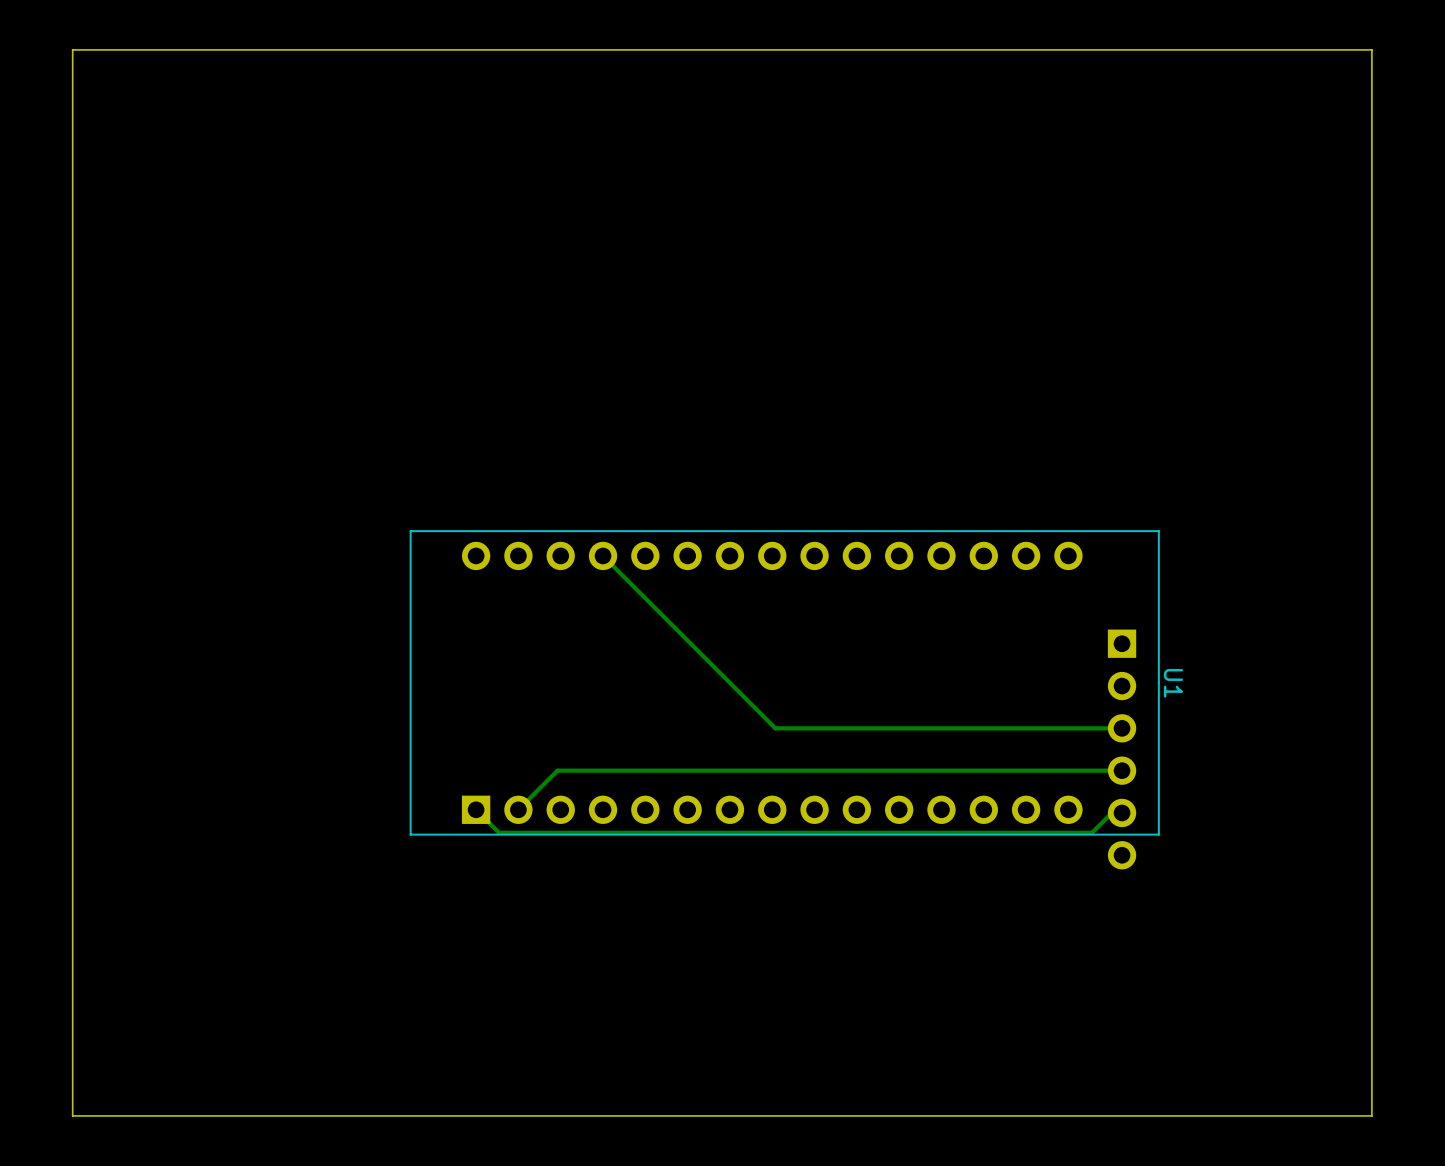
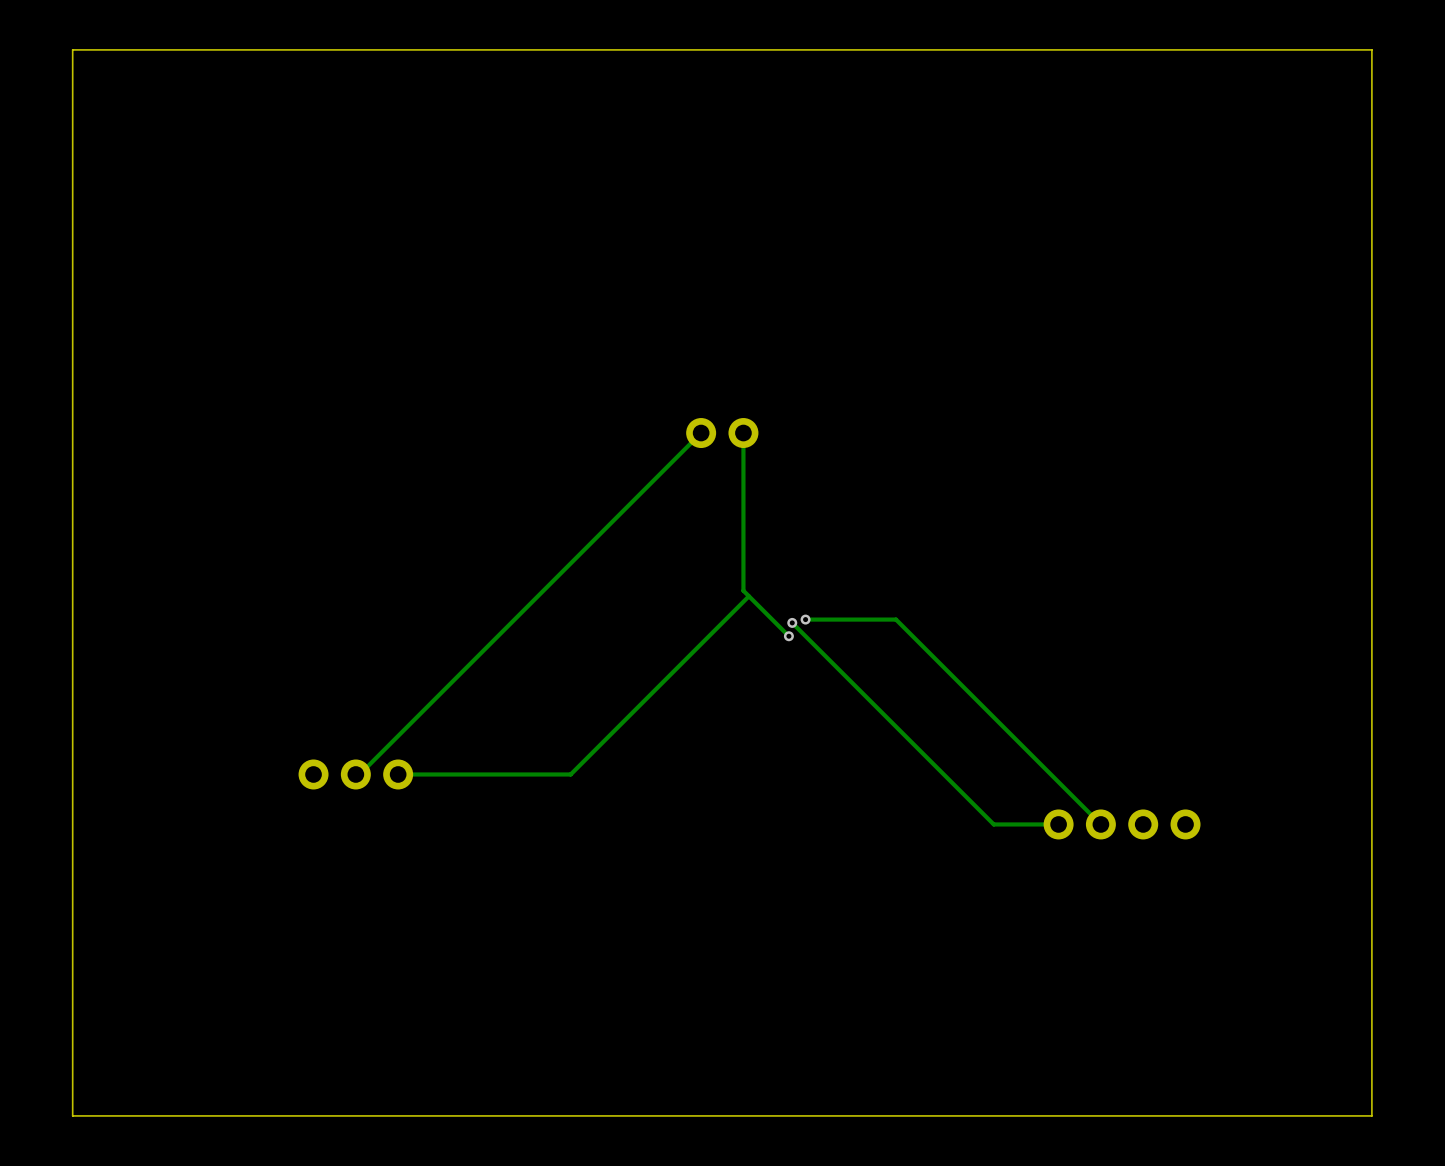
track: none -> (701, 433) (359, 774) (355, 774)
part: none -> (722, 433)
track: none -> (743, 433) (743, 590) (788, 636)
track: (603, 555) (775, 728) (1122, 728) -> none
track: none -> (748, 596) (570, 774) (398, 774)
track: none -> (805, 619) (896, 619) (1100, 824)
via: none -> (805, 619)
track: none -> (792, 622) (993, 824) (1058, 824)
via: none -> (792, 622)
via: none -> (788, 636)
U1: (784, 682) -> none
part: (1122, 749) -> none
track: (1122, 770) (557, 770) (518, 809) -> none
part: none -> (355, 774)
track: (476, 809) (499, 832) (1092, 832) (1111, 812) (1122, 812) -> none
part: none -> (1122, 824)

